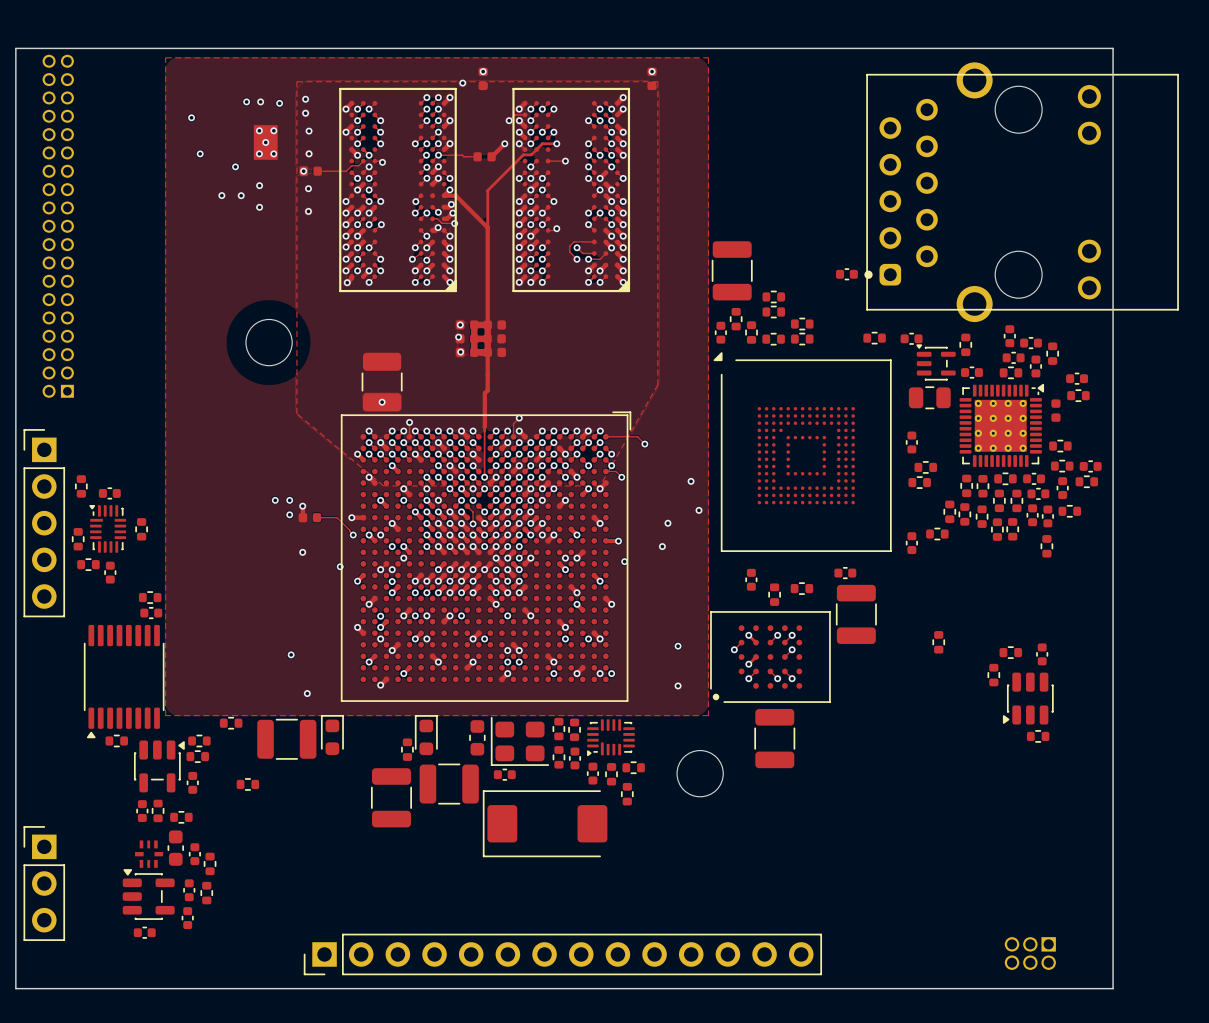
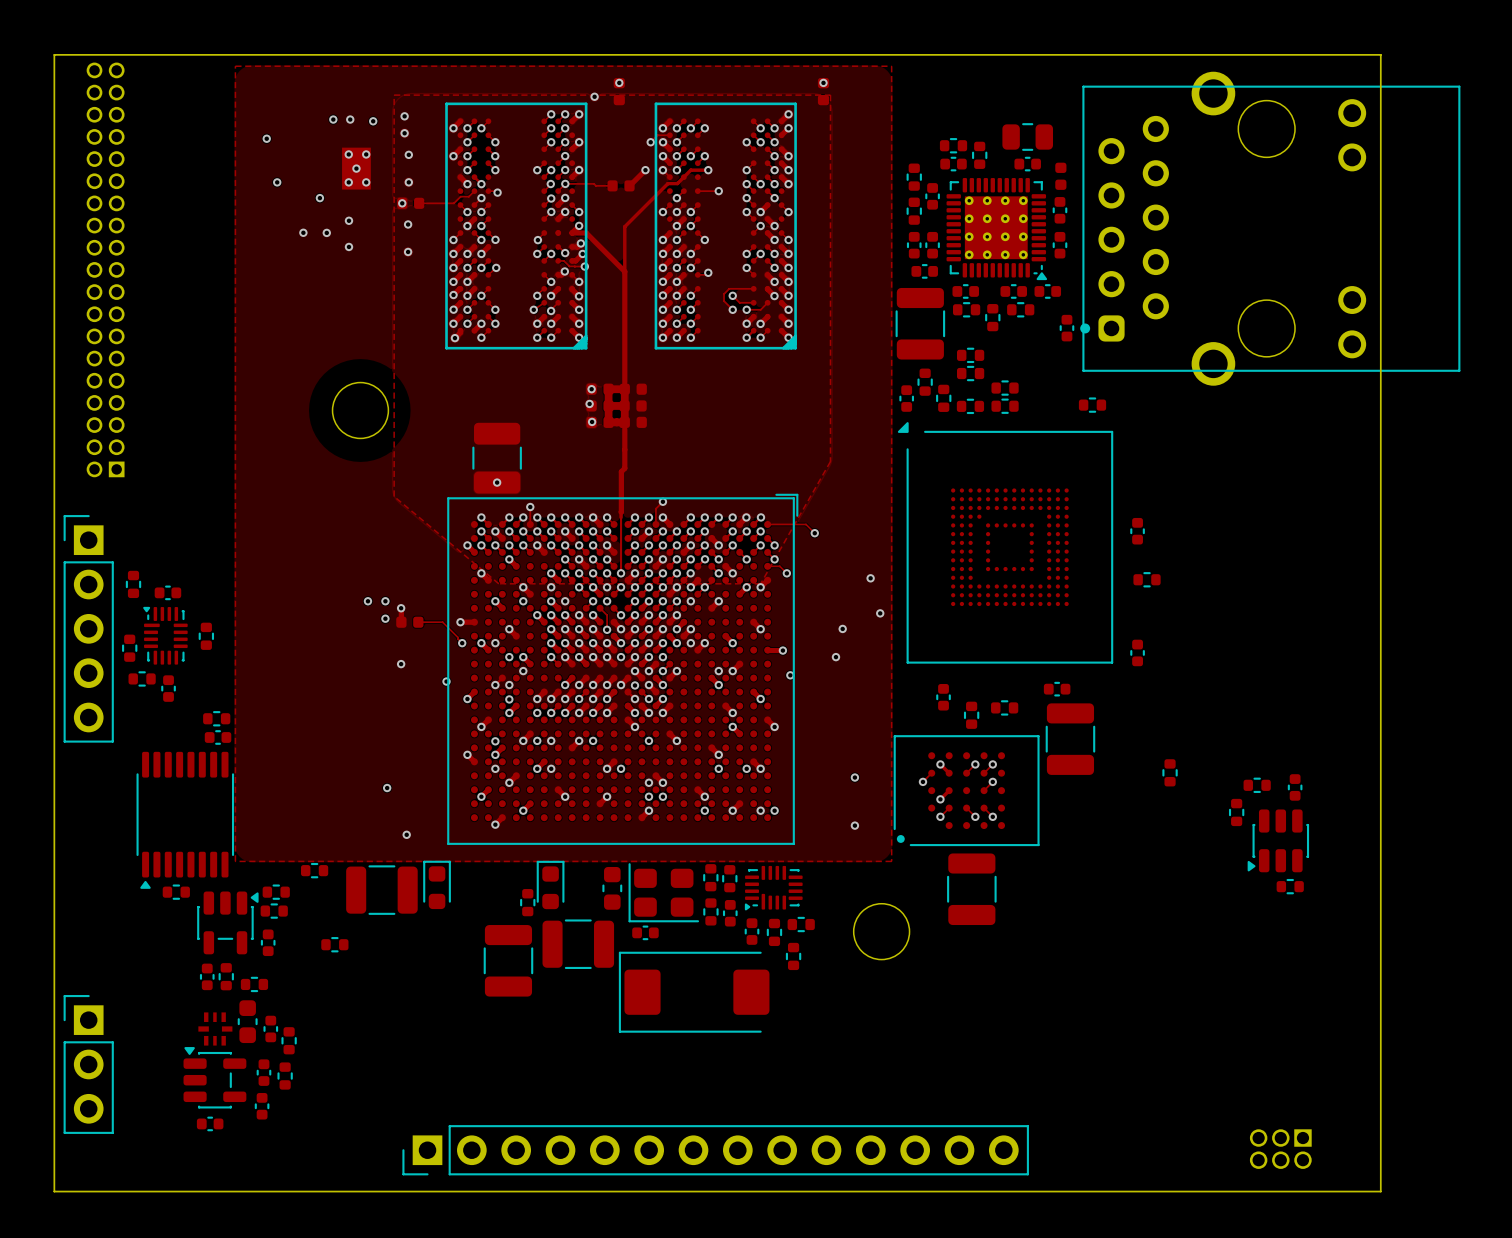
part: none -> (953, 145)
part: none -> (979, 155)
part: none -> (953, 164)
part: none -> (1027, 164)
part: none -> (914, 177)
part: none -> (932, 196)
part: none -> (1059, 210)
part: none -> (914, 211)
part: none -> (914, 245)
part: none -> (932, 245)
part: none -> (1059, 245)
part: none -> (924, 271)
part: none -> (965, 291)
part: none -> (1013, 291)
part: none -> (1047, 291)
part: none -> (966, 309)
part: none -> (1020, 309)
part: none -> (992, 317)
part rotation: 0° (846, 274) -> 90° clockwise (1066, 328)
part: (1009, 336) -> none
part: (911, 338) -> none
part: (1031, 343) -> none
part: (965, 344) -> none
part: (1052, 353) -> none
part: (1013, 357) -> none
part: (936, 362) -> none
part: (1035, 366) -> none
part: (971, 372) -> none
part: (1010, 372) -> none
part: (1077, 378) -> none
part: (1078, 395) -> none
part position: (929, 397) -> (1027, 137)
part position: (1055, 410) -> (1060, 176)
part rotation: 0° (1001, 425) -> 90° clockwise (996, 229)
part position: (1001, 425) -> (996, 229)
part: (1060, 446) -> none
part: (1062, 466) -> none
part: (1090, 466) -> none
part: (925, 467) -> none
part: (1005, 478) -> none
part: (1034, 478) -> none
part: (1086, 481) -> none
part: (966, 485) -> none
part: (982, 486) -> none
part: (1062, 488) -> none
part: (1038, 493) -> none
part: (999, 500) -> none
part: (1016, 500) -> none
part: (949, 511) -> none
part: (1069, 511) -> none
part: (964, 514) -> none
part: (1032, 515) -> none
part: (982, 516) -> none
part: (1047, 516) -> none
part: (997, 529) -> none
part: (1012, 529) -> none
part: (937, 534) -> none
part: (1046, 546) -> none

